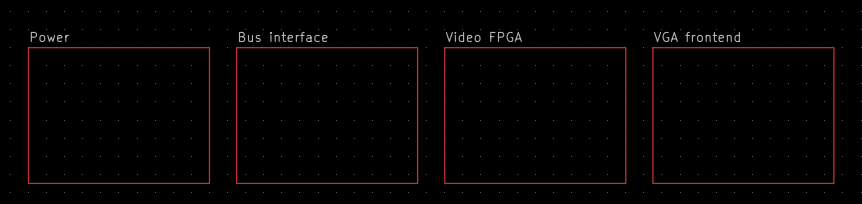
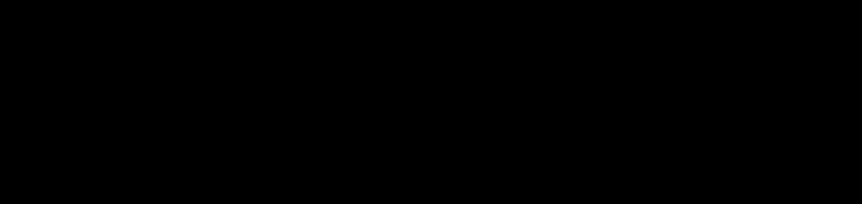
sheet Power: (118, 115) -> none
sheet Bus interface: (327, 115) -> none
sheet Video FPGA: (535, 115) -> none
sheet VGA frontend: (743, 115) -> none

